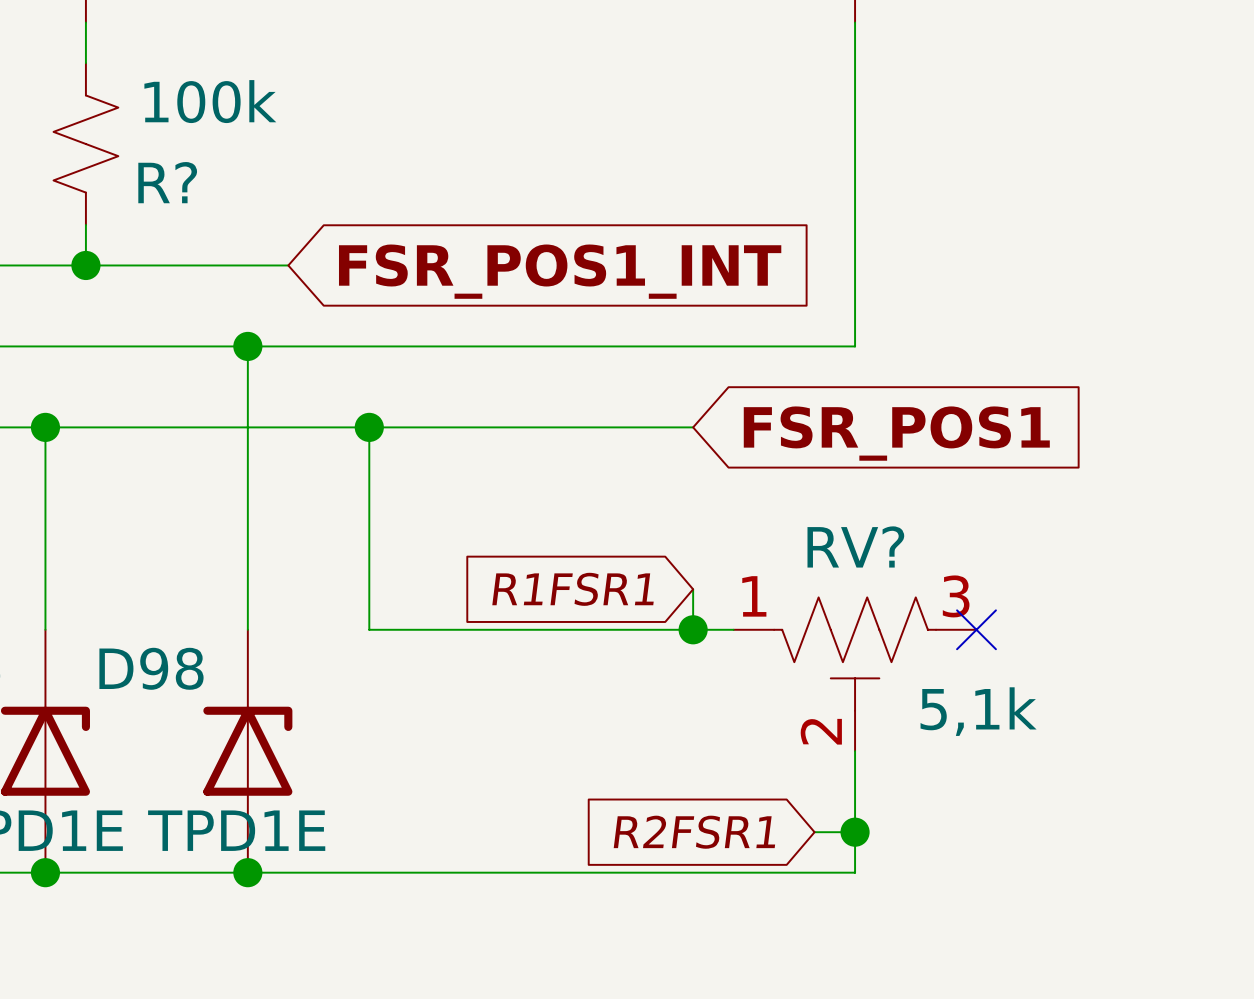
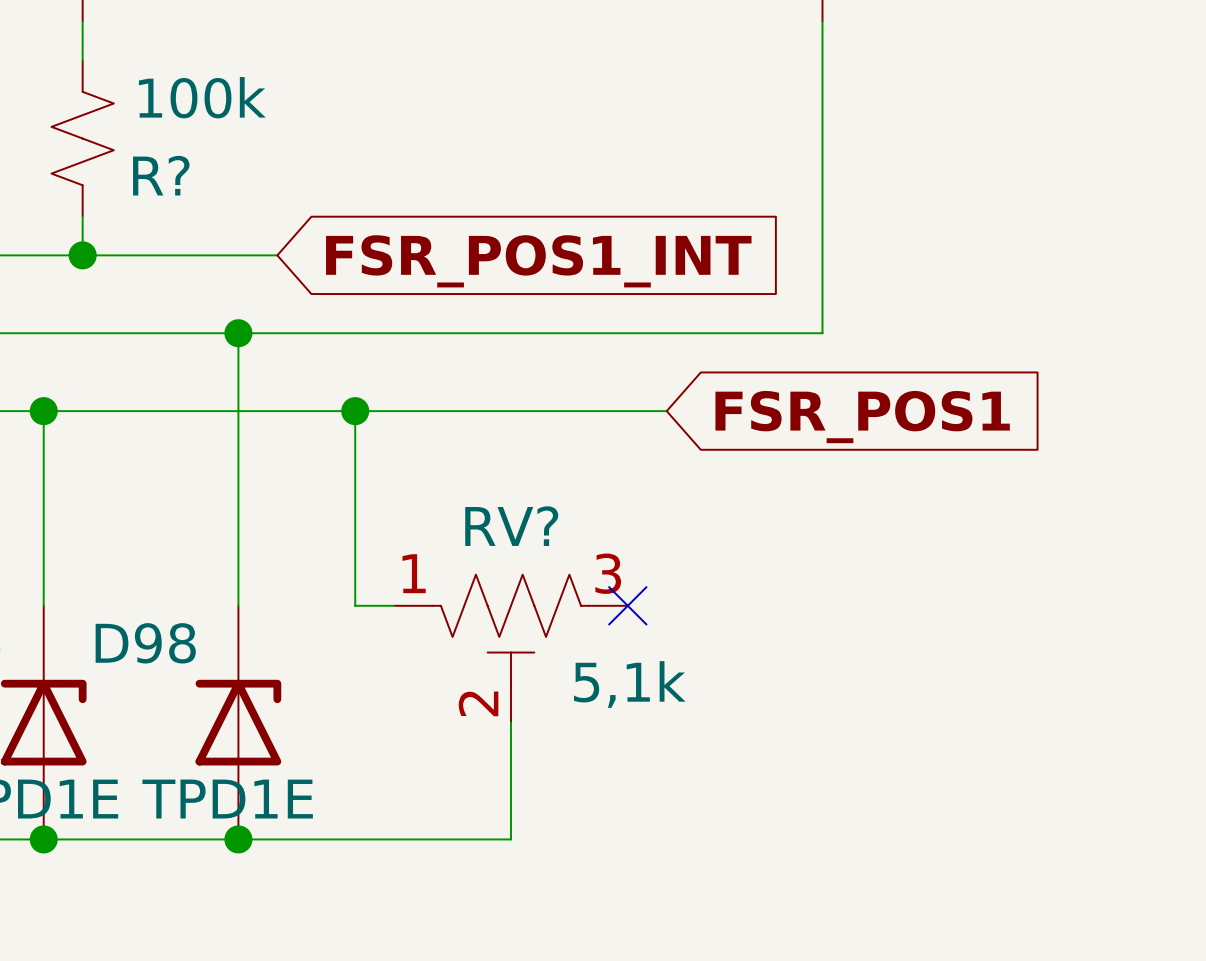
global label: R1FSR1 (572, 589) -> none
wire: (693, 589) (693, 629) -> none
wire: (409, 629) (733, 629) -> none
no-connect mark: none -> (627, 605)
junction: (693, 629) -> none
no-connect mark: (976, 629) -> none
RV? position: (855, 674) -> (510, 648)
wire: (855, 751) (855, 872) (531, 872) -> (510, 722) (510, 839)
global label: R2FSR1 (694, 832) -> none
wire: (814, 832) (855, 832) -> none
junction: (855, 832) -> none

